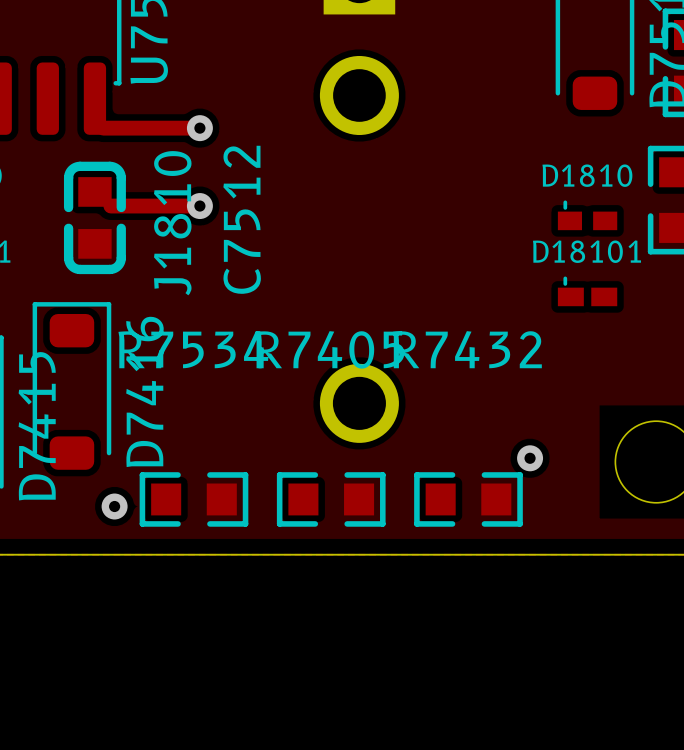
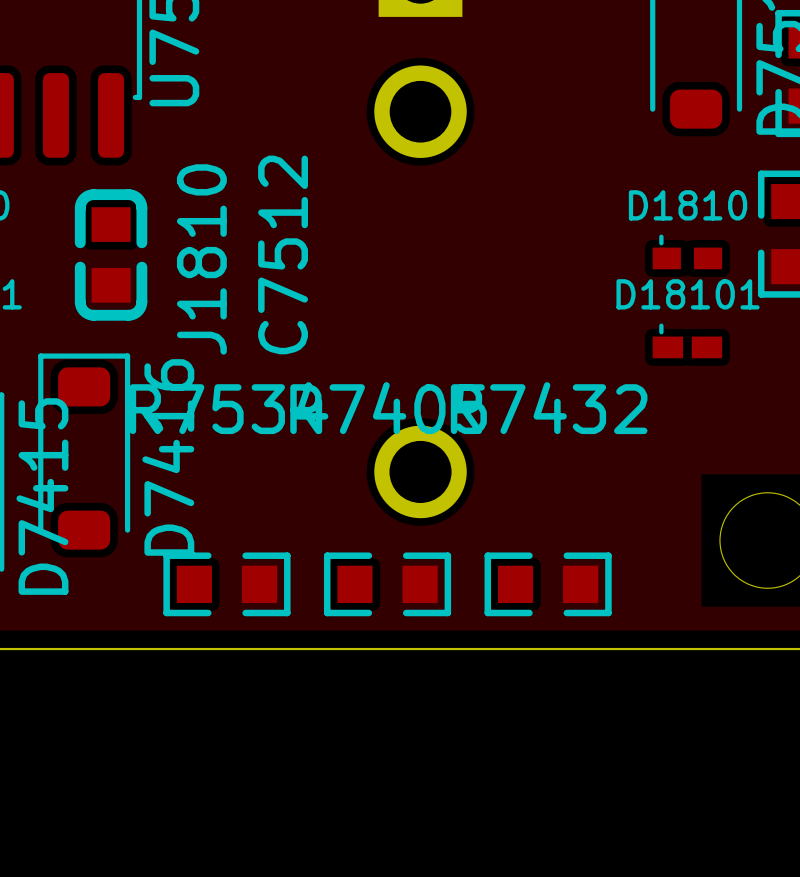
track: (103, 128) (199, 128) -> none
via: (199, 128) -> none
track: (110, 206) (199, 206) -> none
via: (199, 206) -> none
via: (530, 458) -> none
via: (114, 506) -> none

